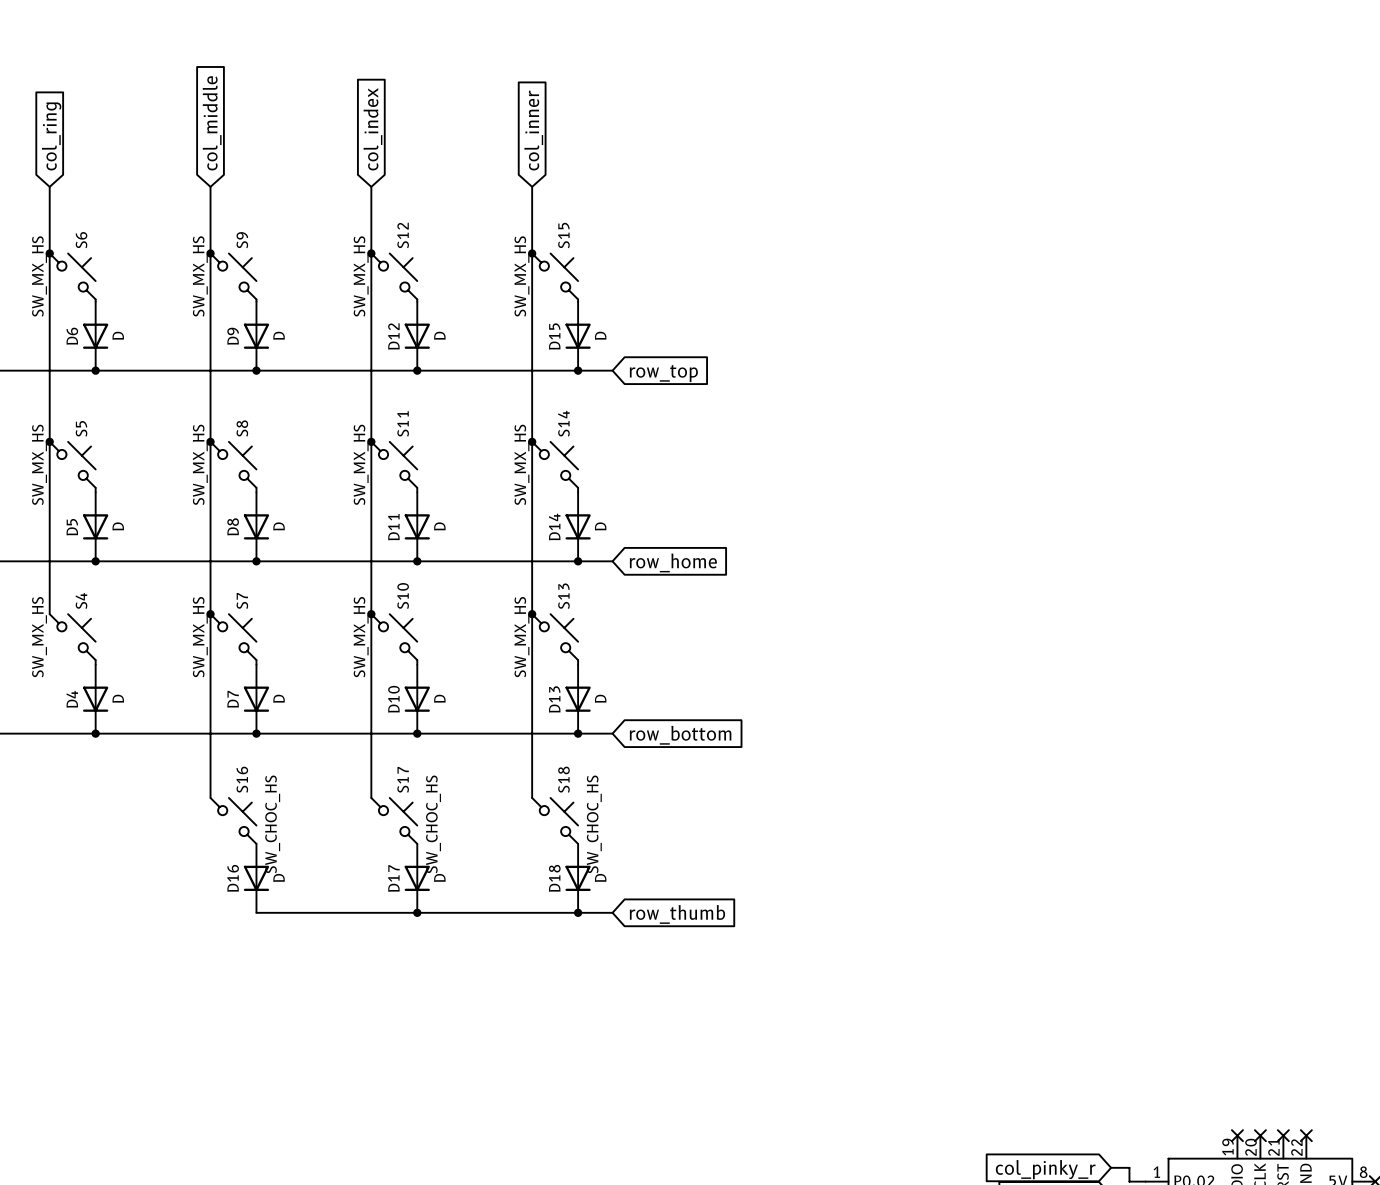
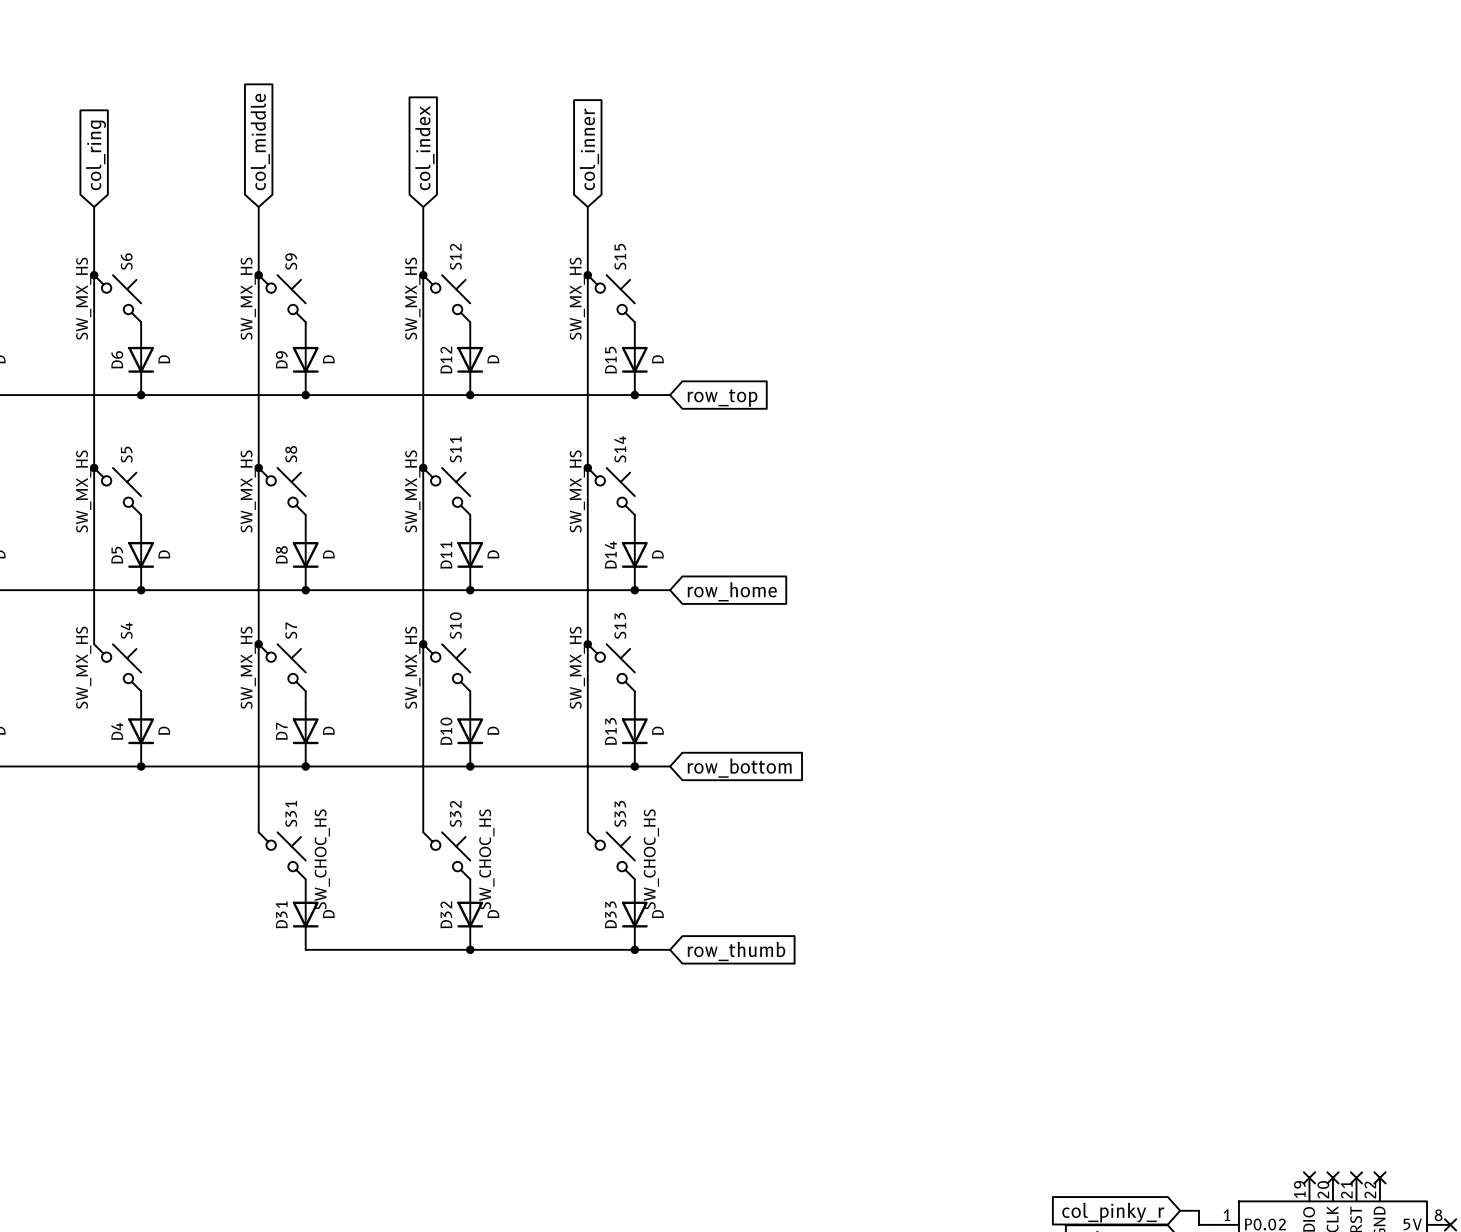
S16 name: S16 (242, 779) -> S31 (291, 813)
S17 name: S17 (403, 779) -> S32 (455, 813)
S18 name: S18 (563, 779) -> S33 (620, 813)
D16 name: D16 (233, 878) -> D31 (281, 914)
D17 name: D17 (393, 878) -> D32 (446, 914)
D18 name: D18 (554, 878) -> D33 (610, 914)

